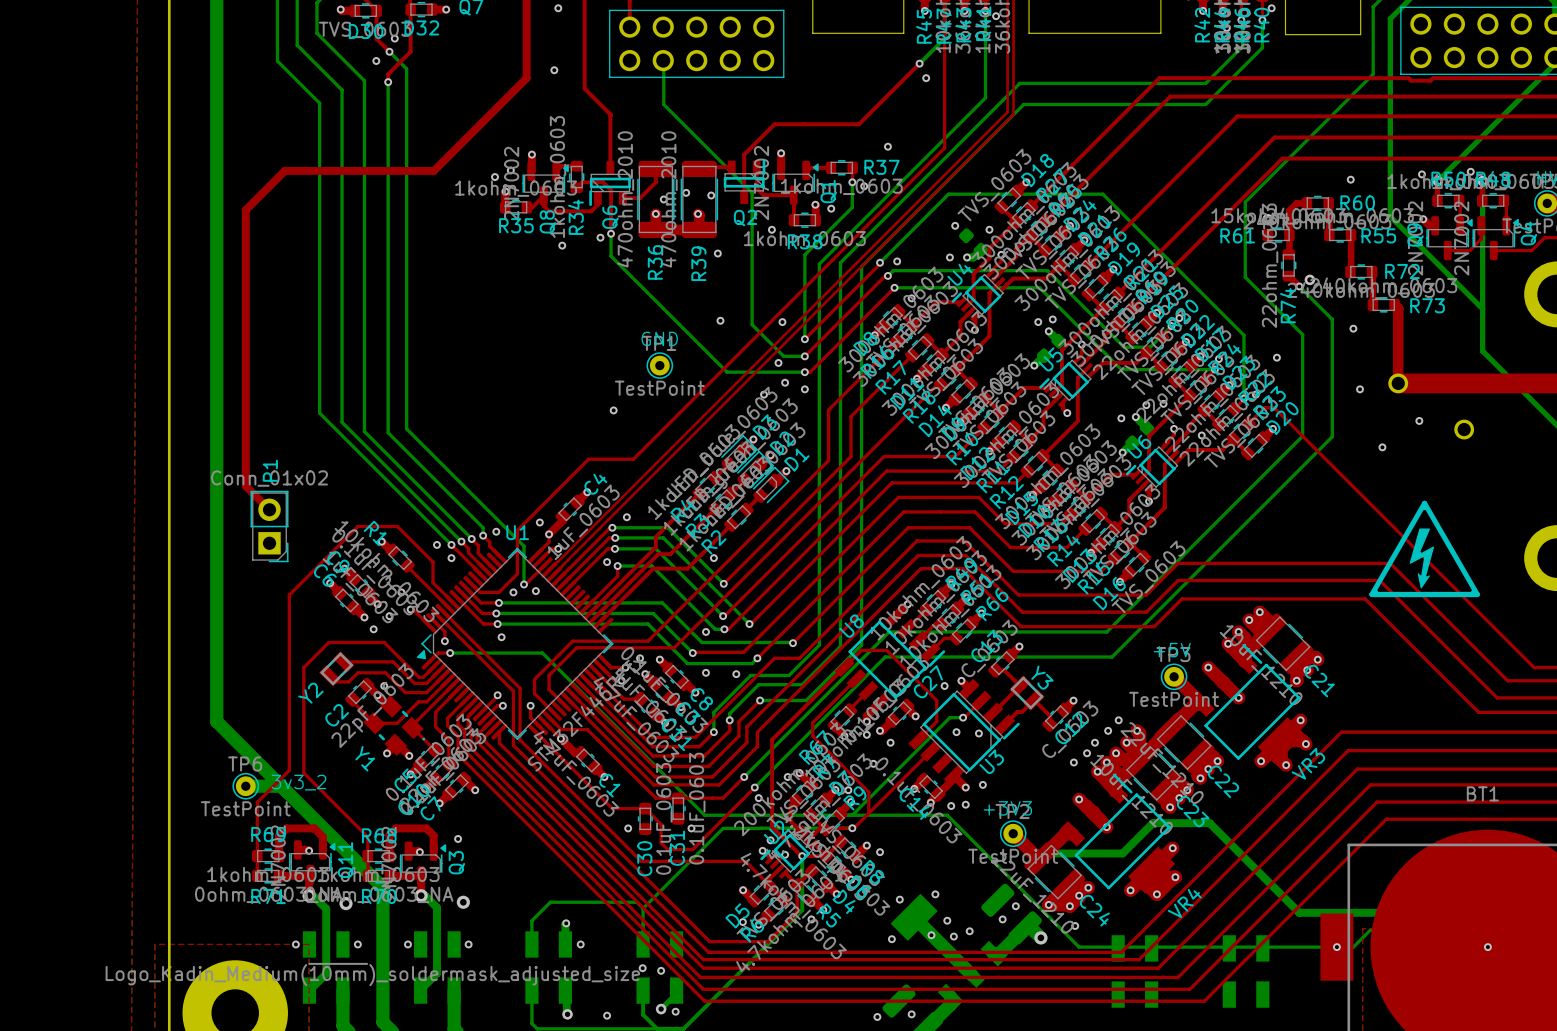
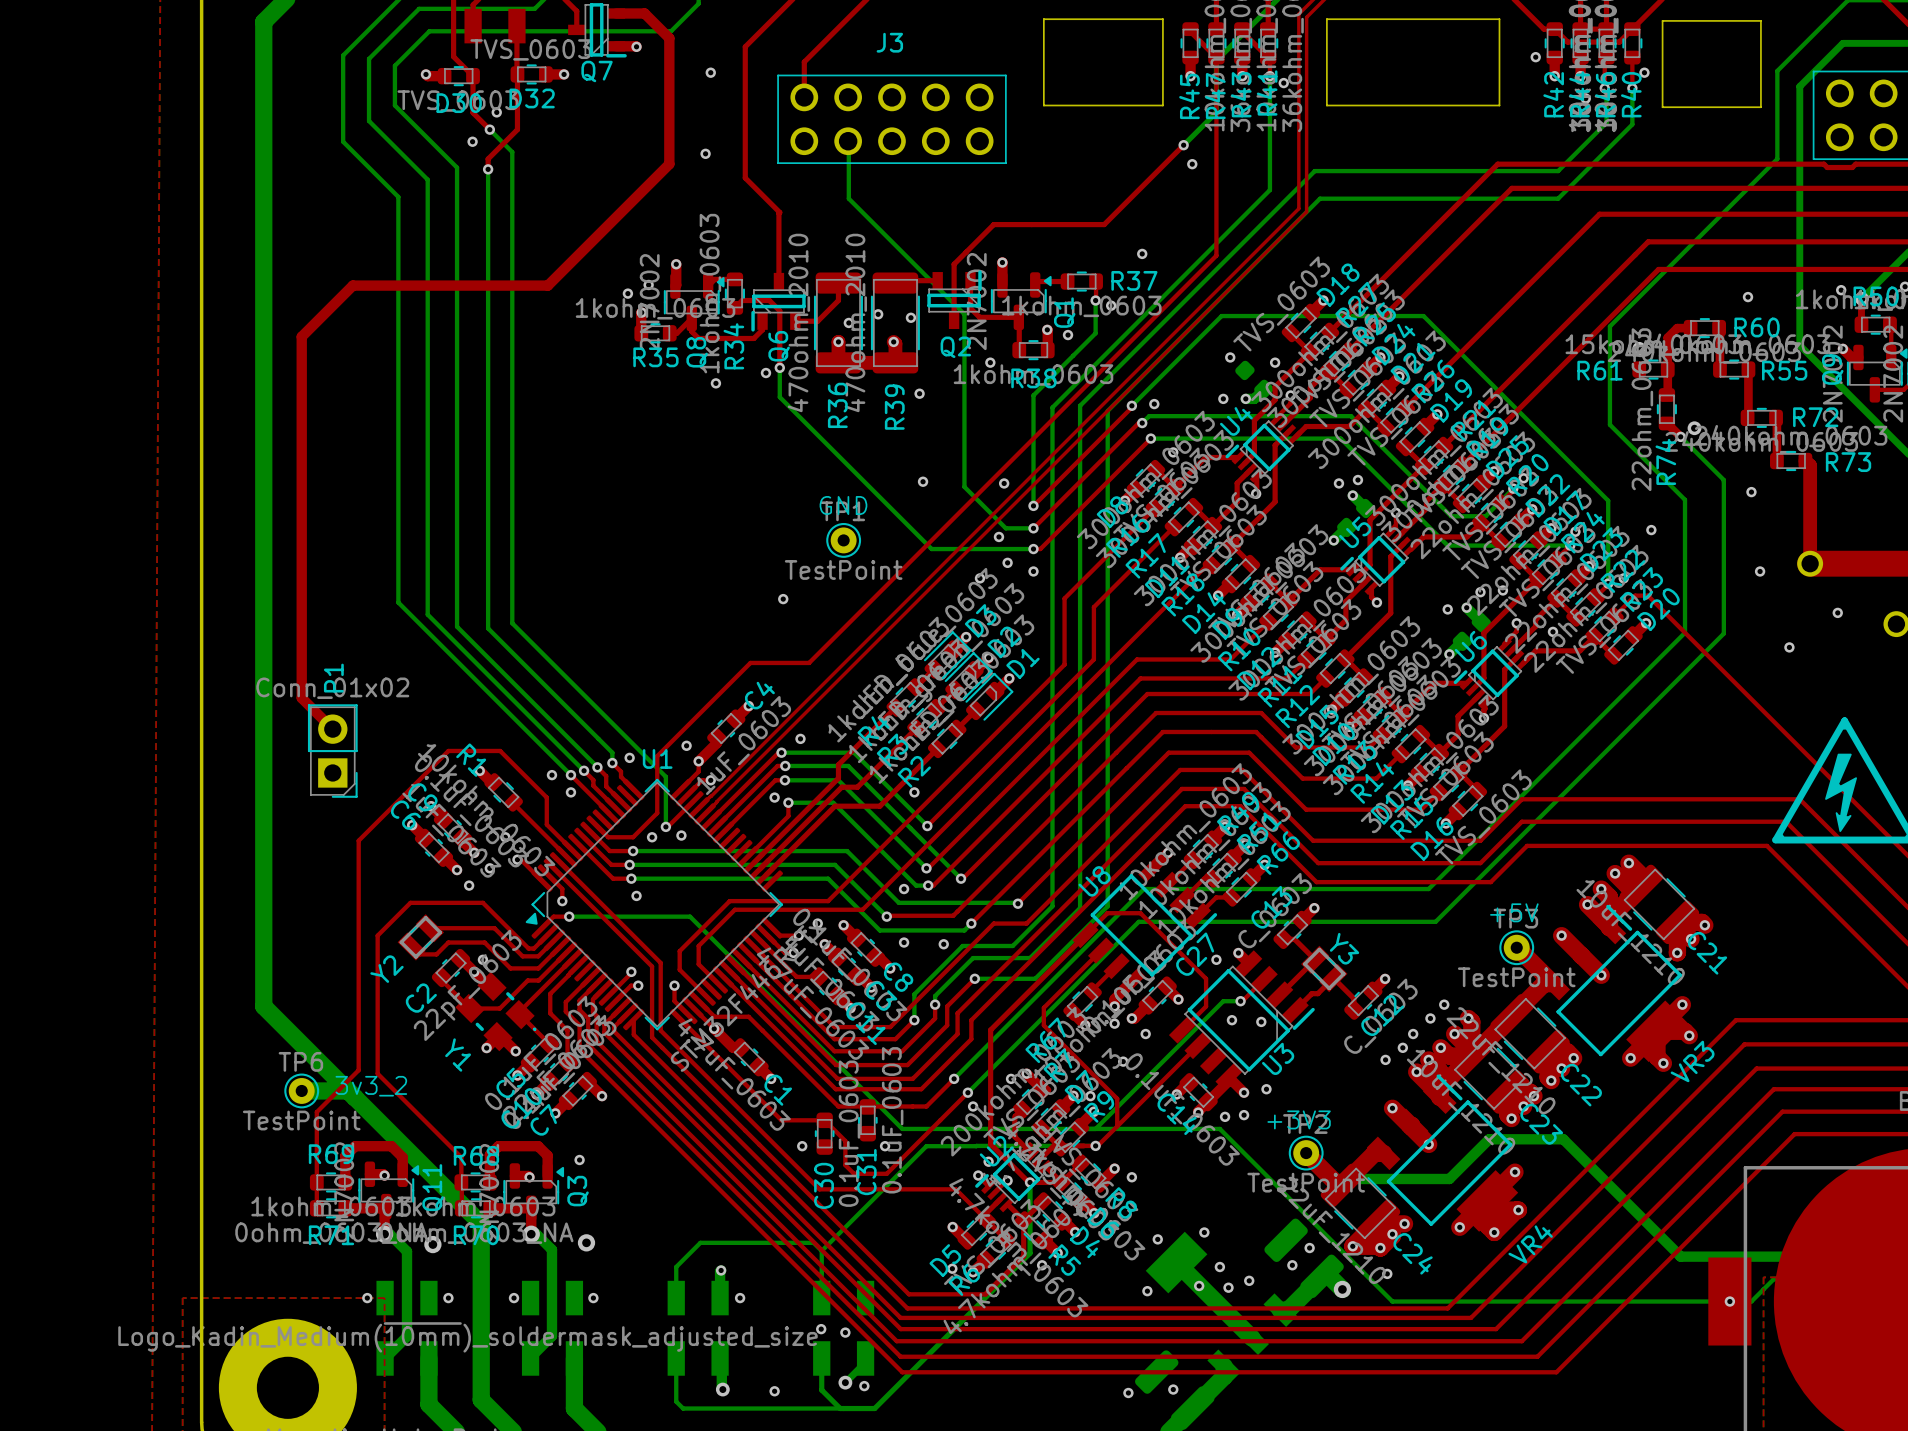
part: (1134, 971) -> none
part: (1246, 971) -> none

